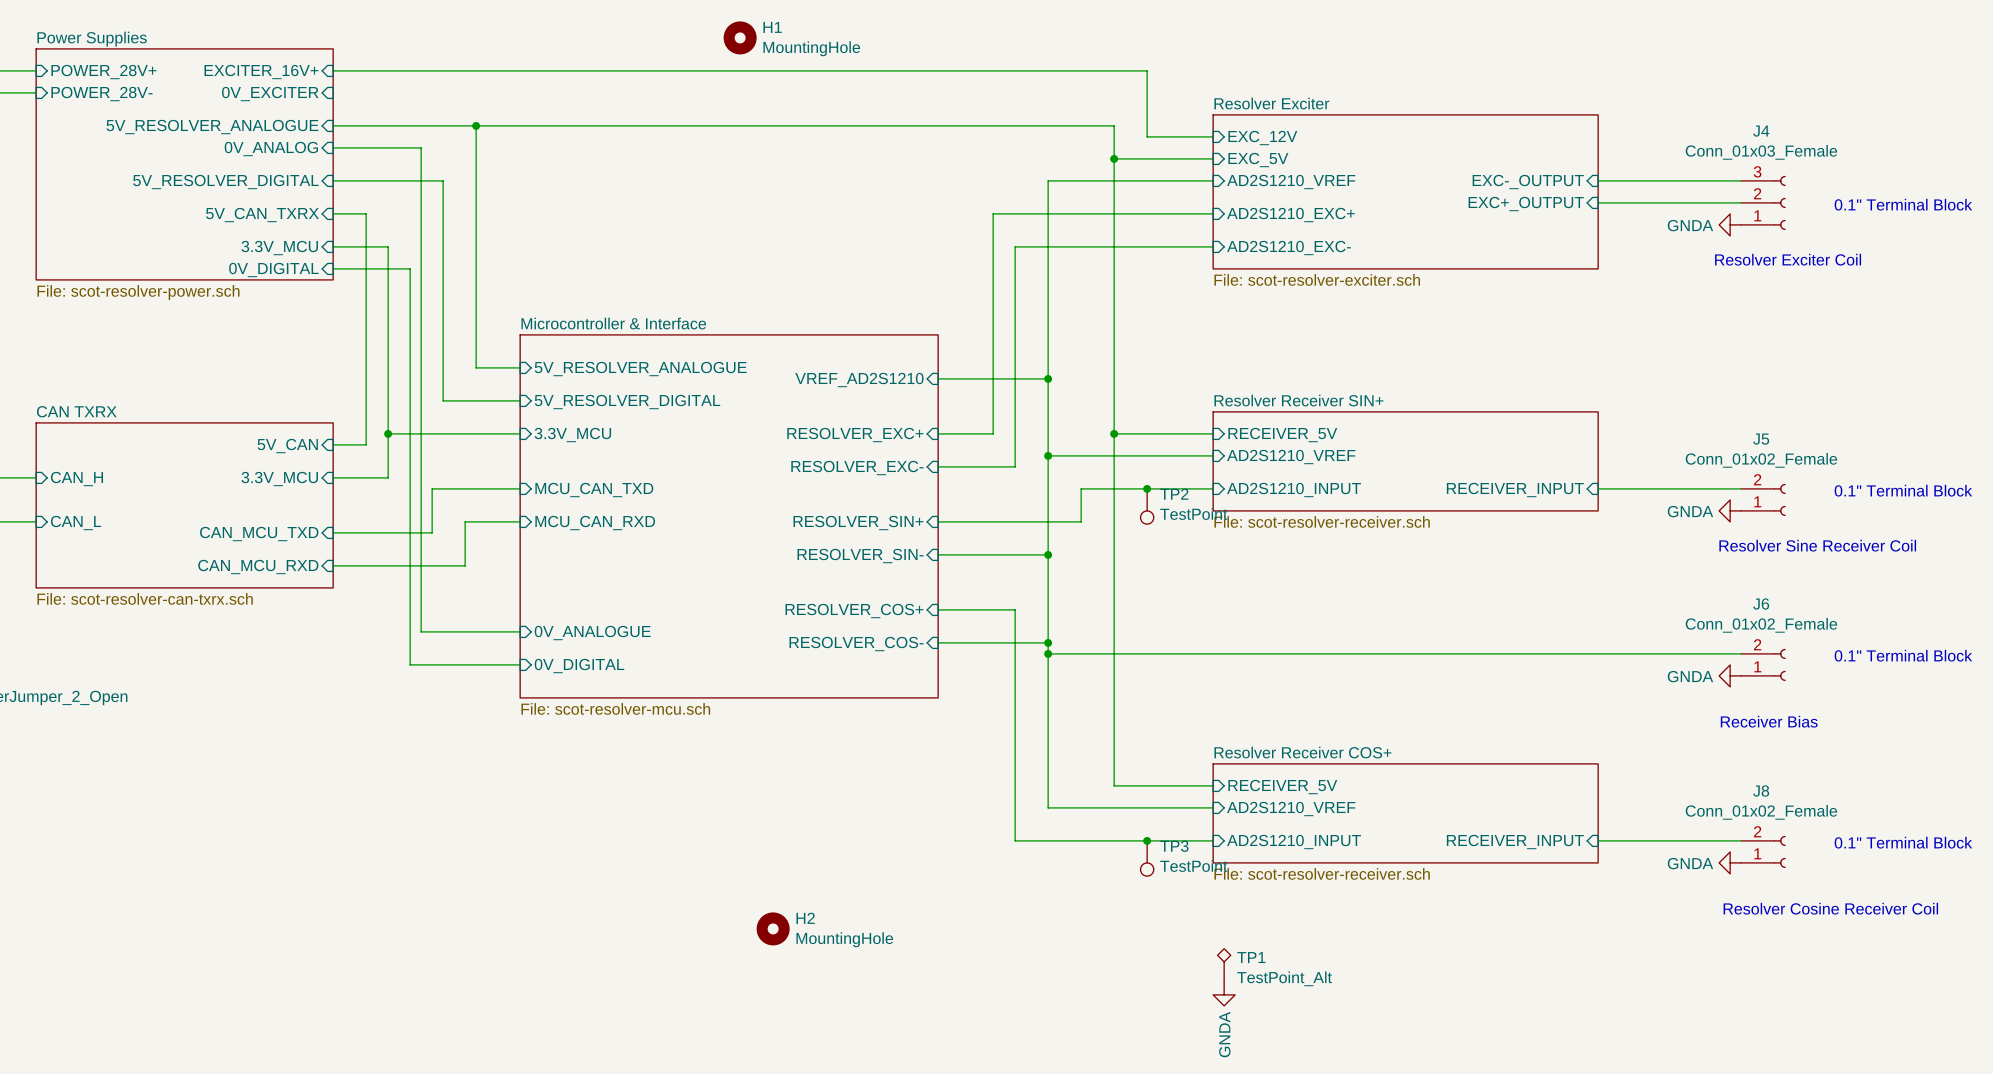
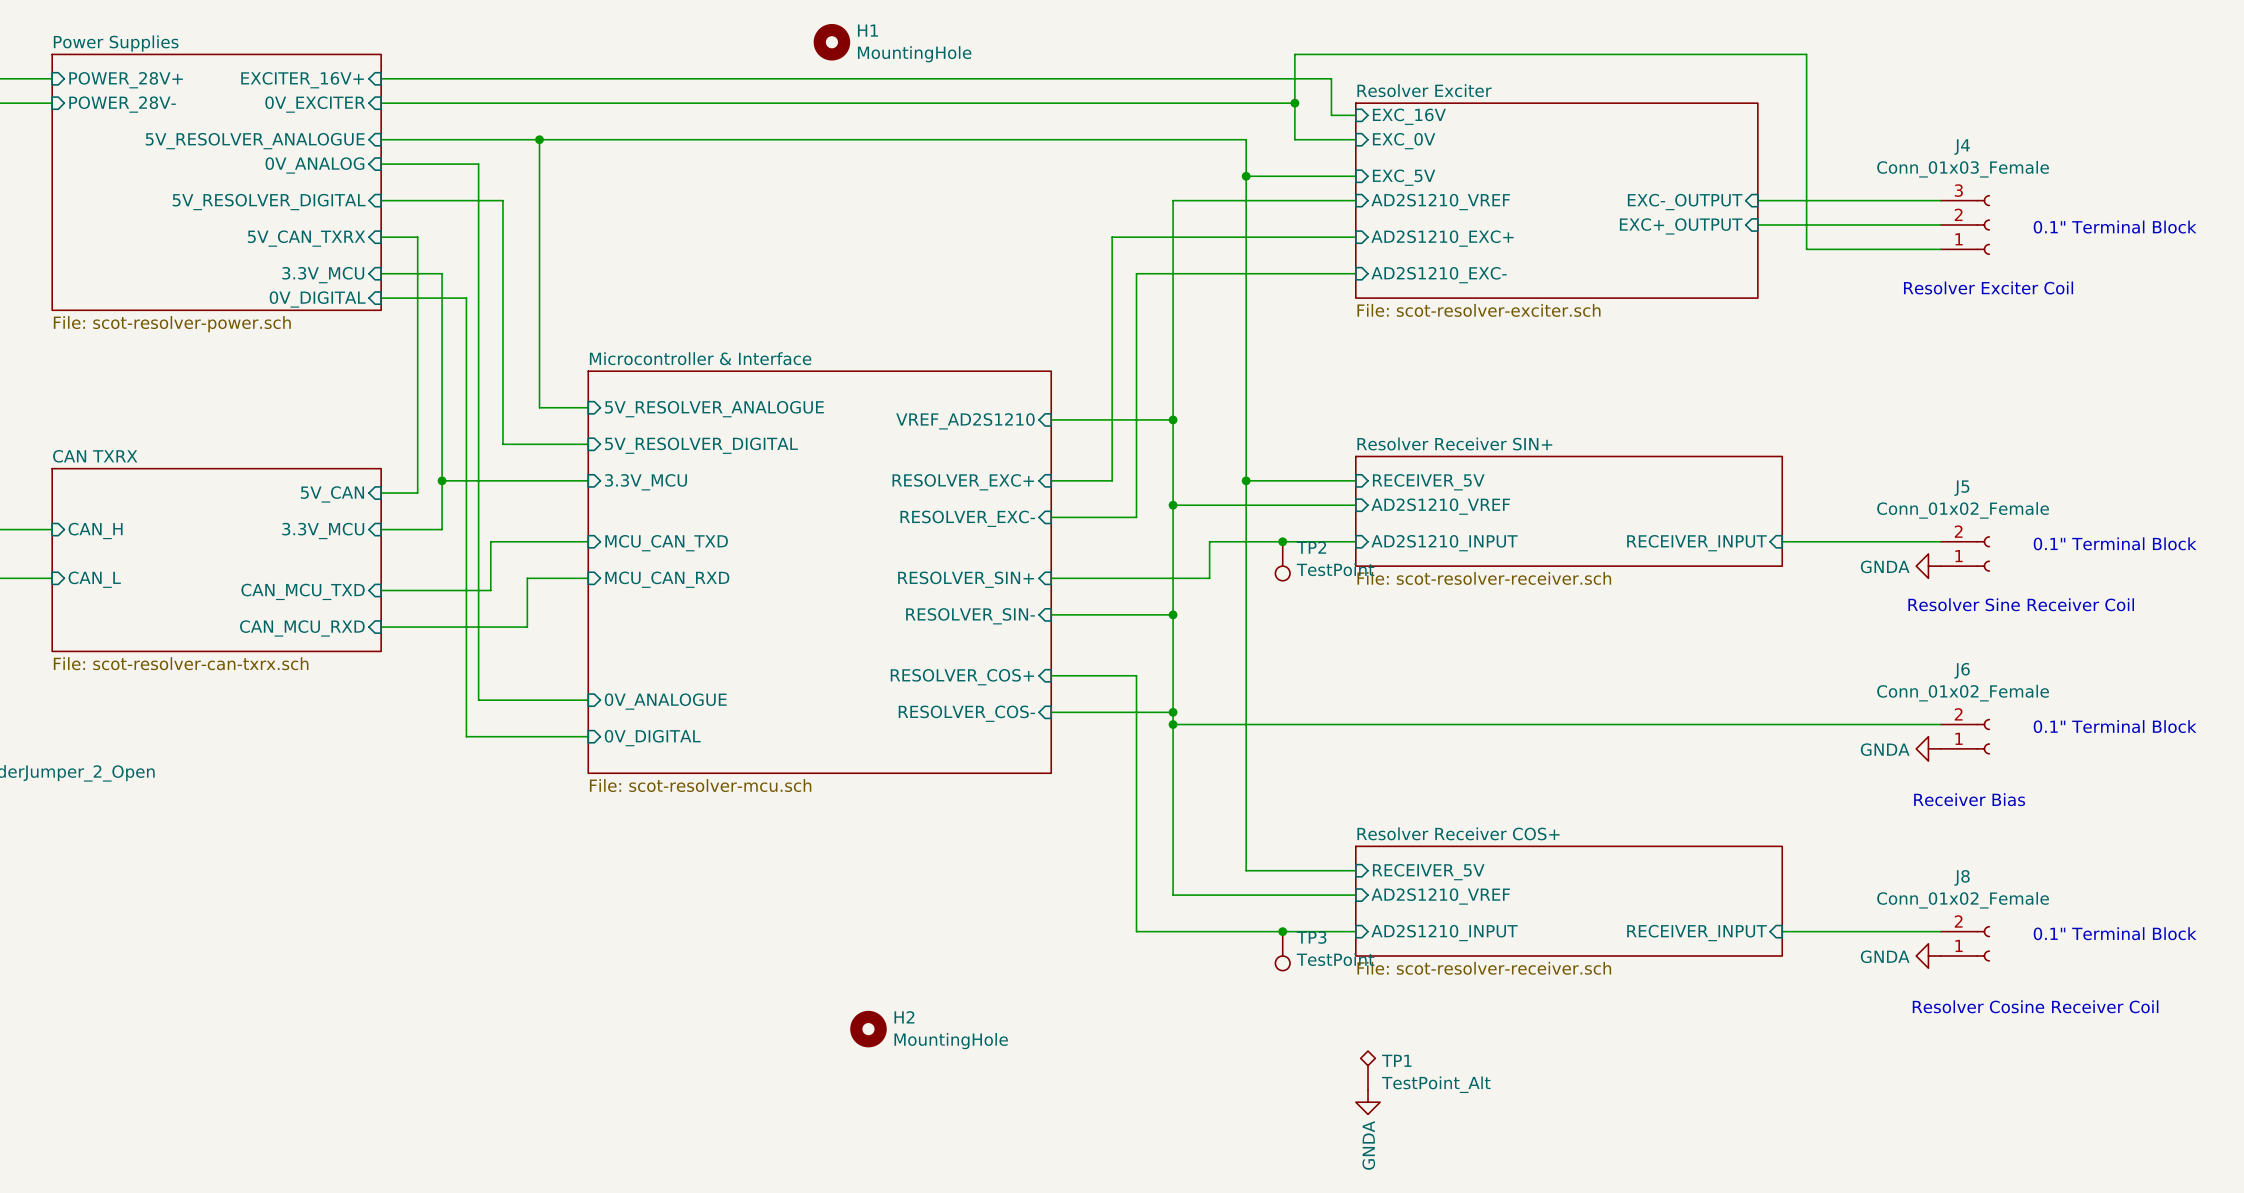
wire: (1147, 70) (1147, 136) (1213, 136) -> (1282, 78) (1331, 78) (1331, 115) (1355, 115)
wire: none -> (381, 103) (1294, 103)
junction: none -> (1294, 103)
sheet pin: none -> EXC_16V (1409, 116)
wire: none -> (1355, 139) (1294, 139) (1294, 54) (1806, 54) (1806, 249) (1940, 249)
sheet pin: EXC_12V (1262, 138) -> EXC_0V (1404, 141)
sheet Resolver Exciter: none -> File: scot-resolver-exciter.sch (1556, 200)
wire: none -> (1757, 200) (1782, 200)
sheet pin position: EXC-_OUTPUT (1528, 182) -> EXC-_OUTPUT (1685, 202)
sheet Resolver Exciter: File: scot-resolver-exciter.sch (1405, 191) -> none
wire: none -> (1757, 225) (1782, 225)
sheet pin position: EXC+_OUTPUT (1526, 204) -> EXC+_OUTPUT (1681, 226)
power symbol: GNDA (1730, 224) -> none

